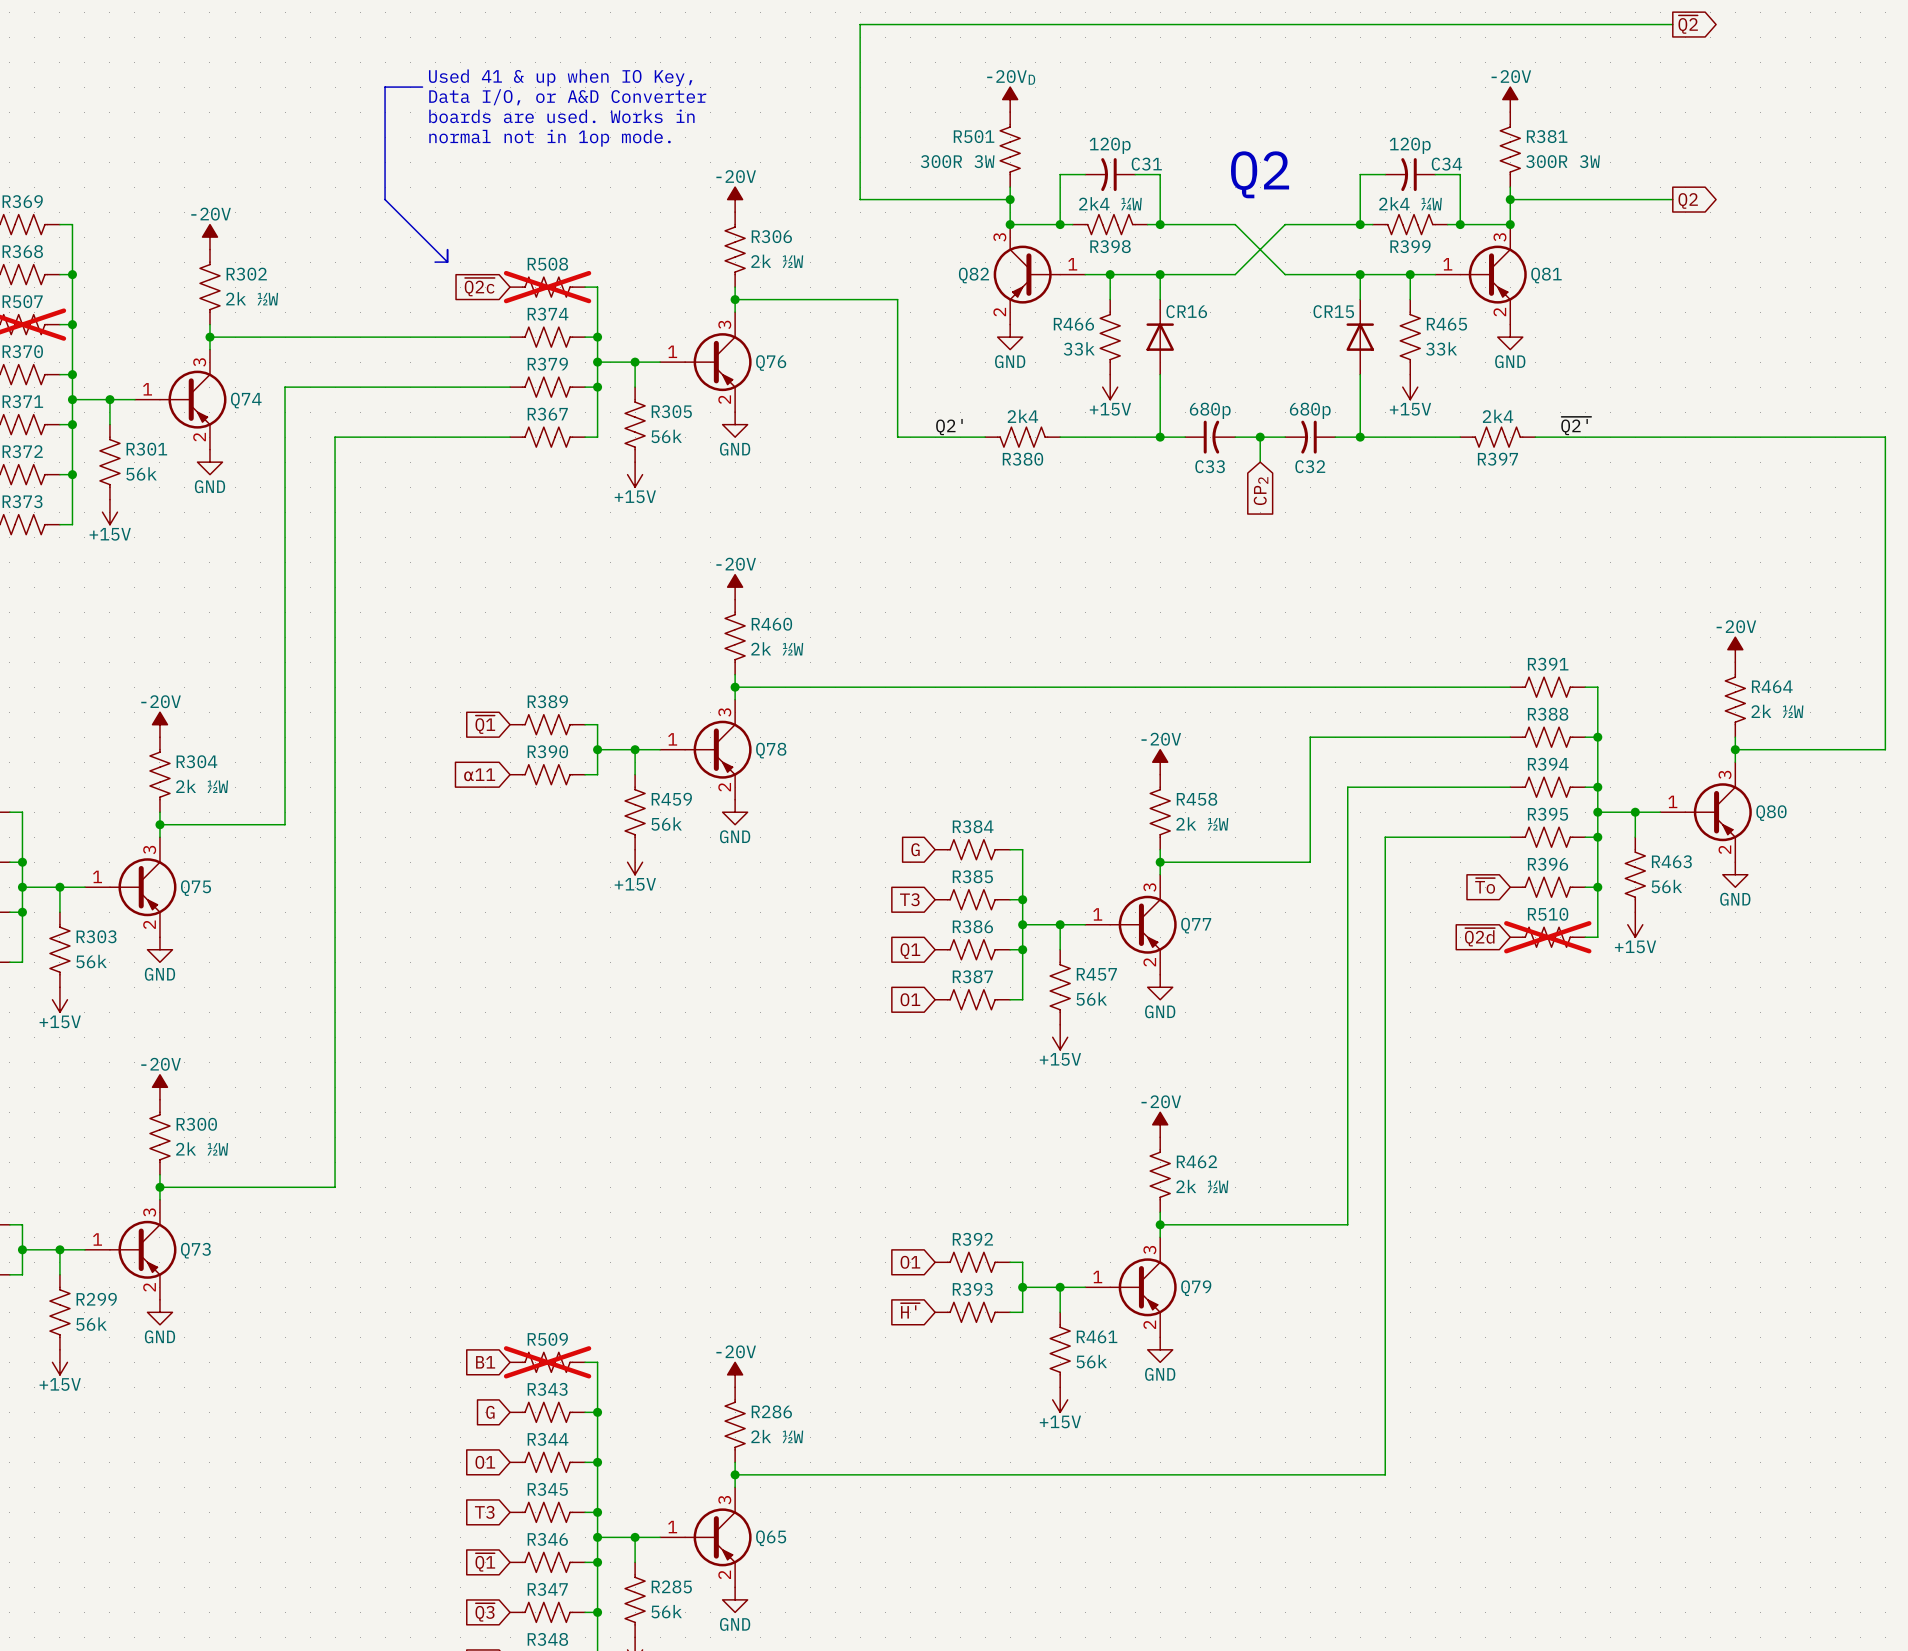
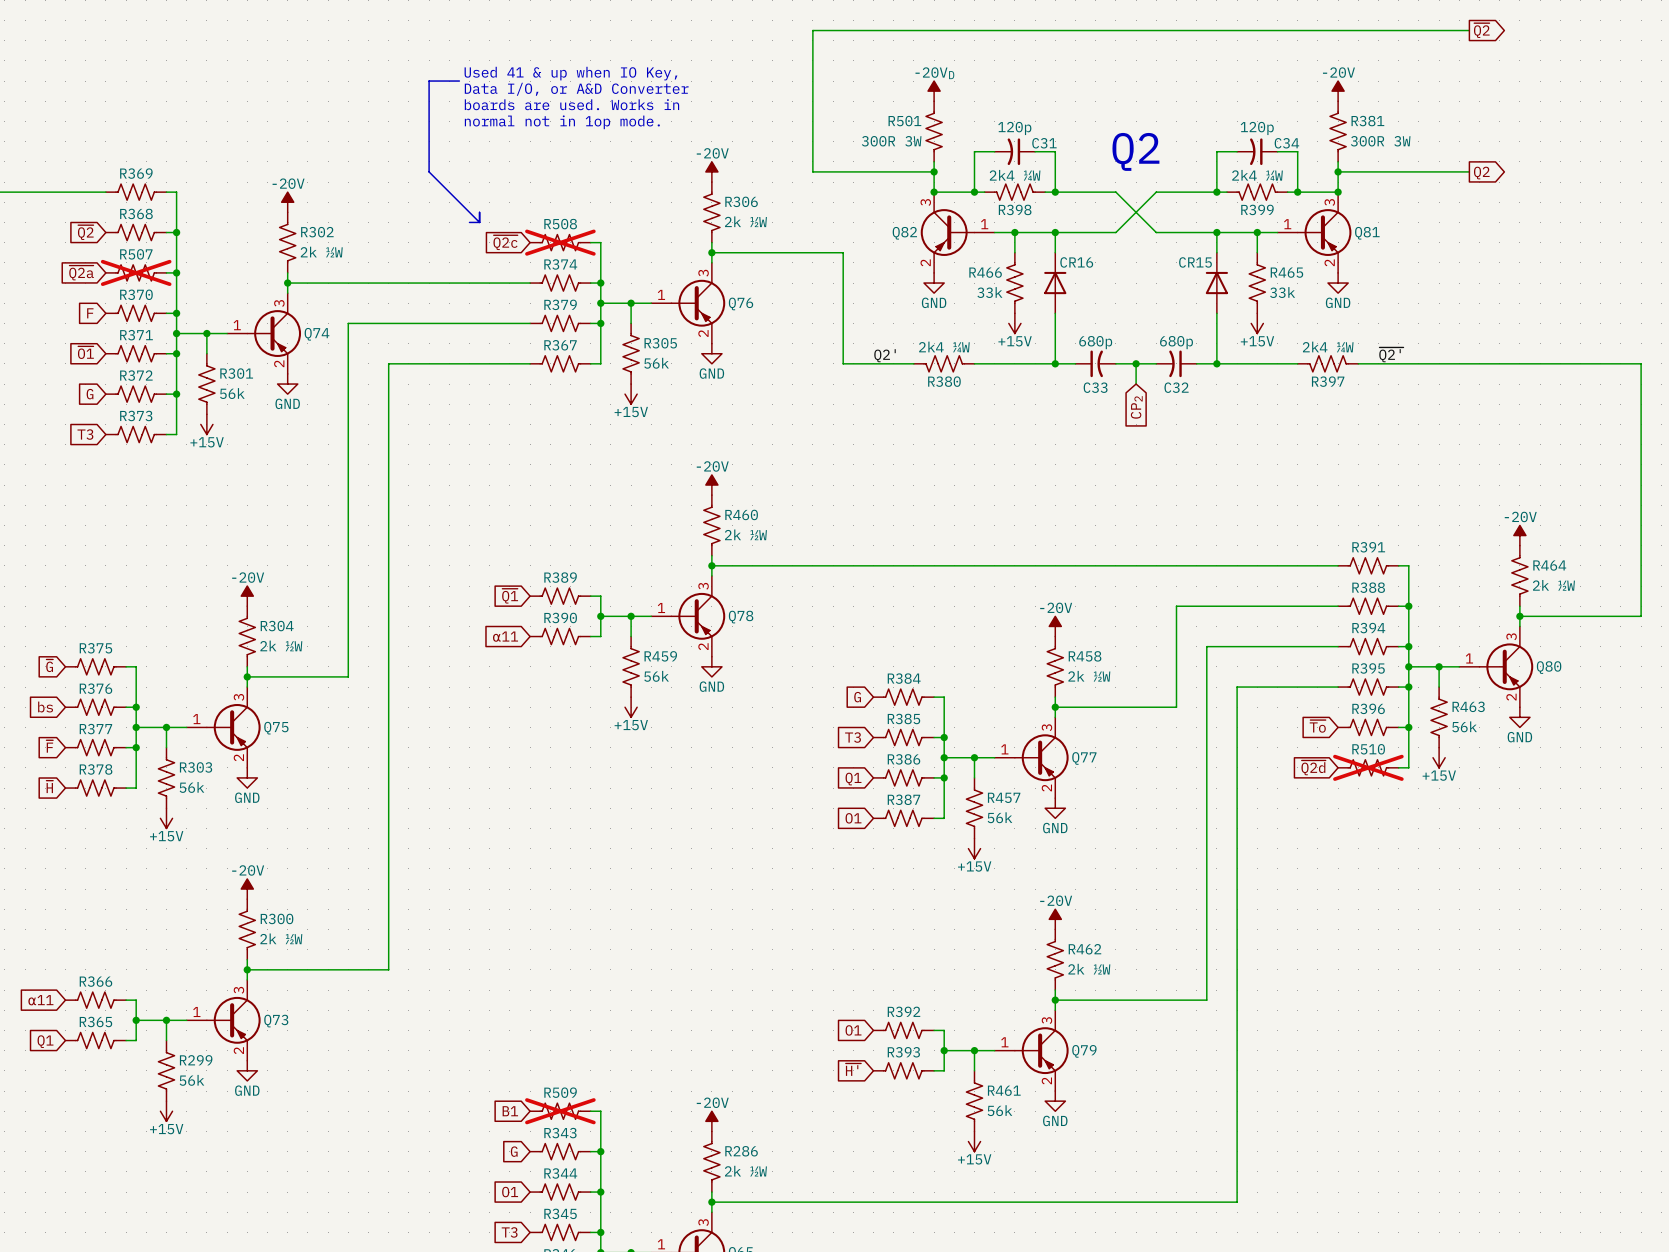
R380 value: 2k4 (1022, 416) -> 2k4 ¼W (944, 346)
R397 value: 2k4 (1498, 416) -> 2k4 ¼W (1328, 346)

